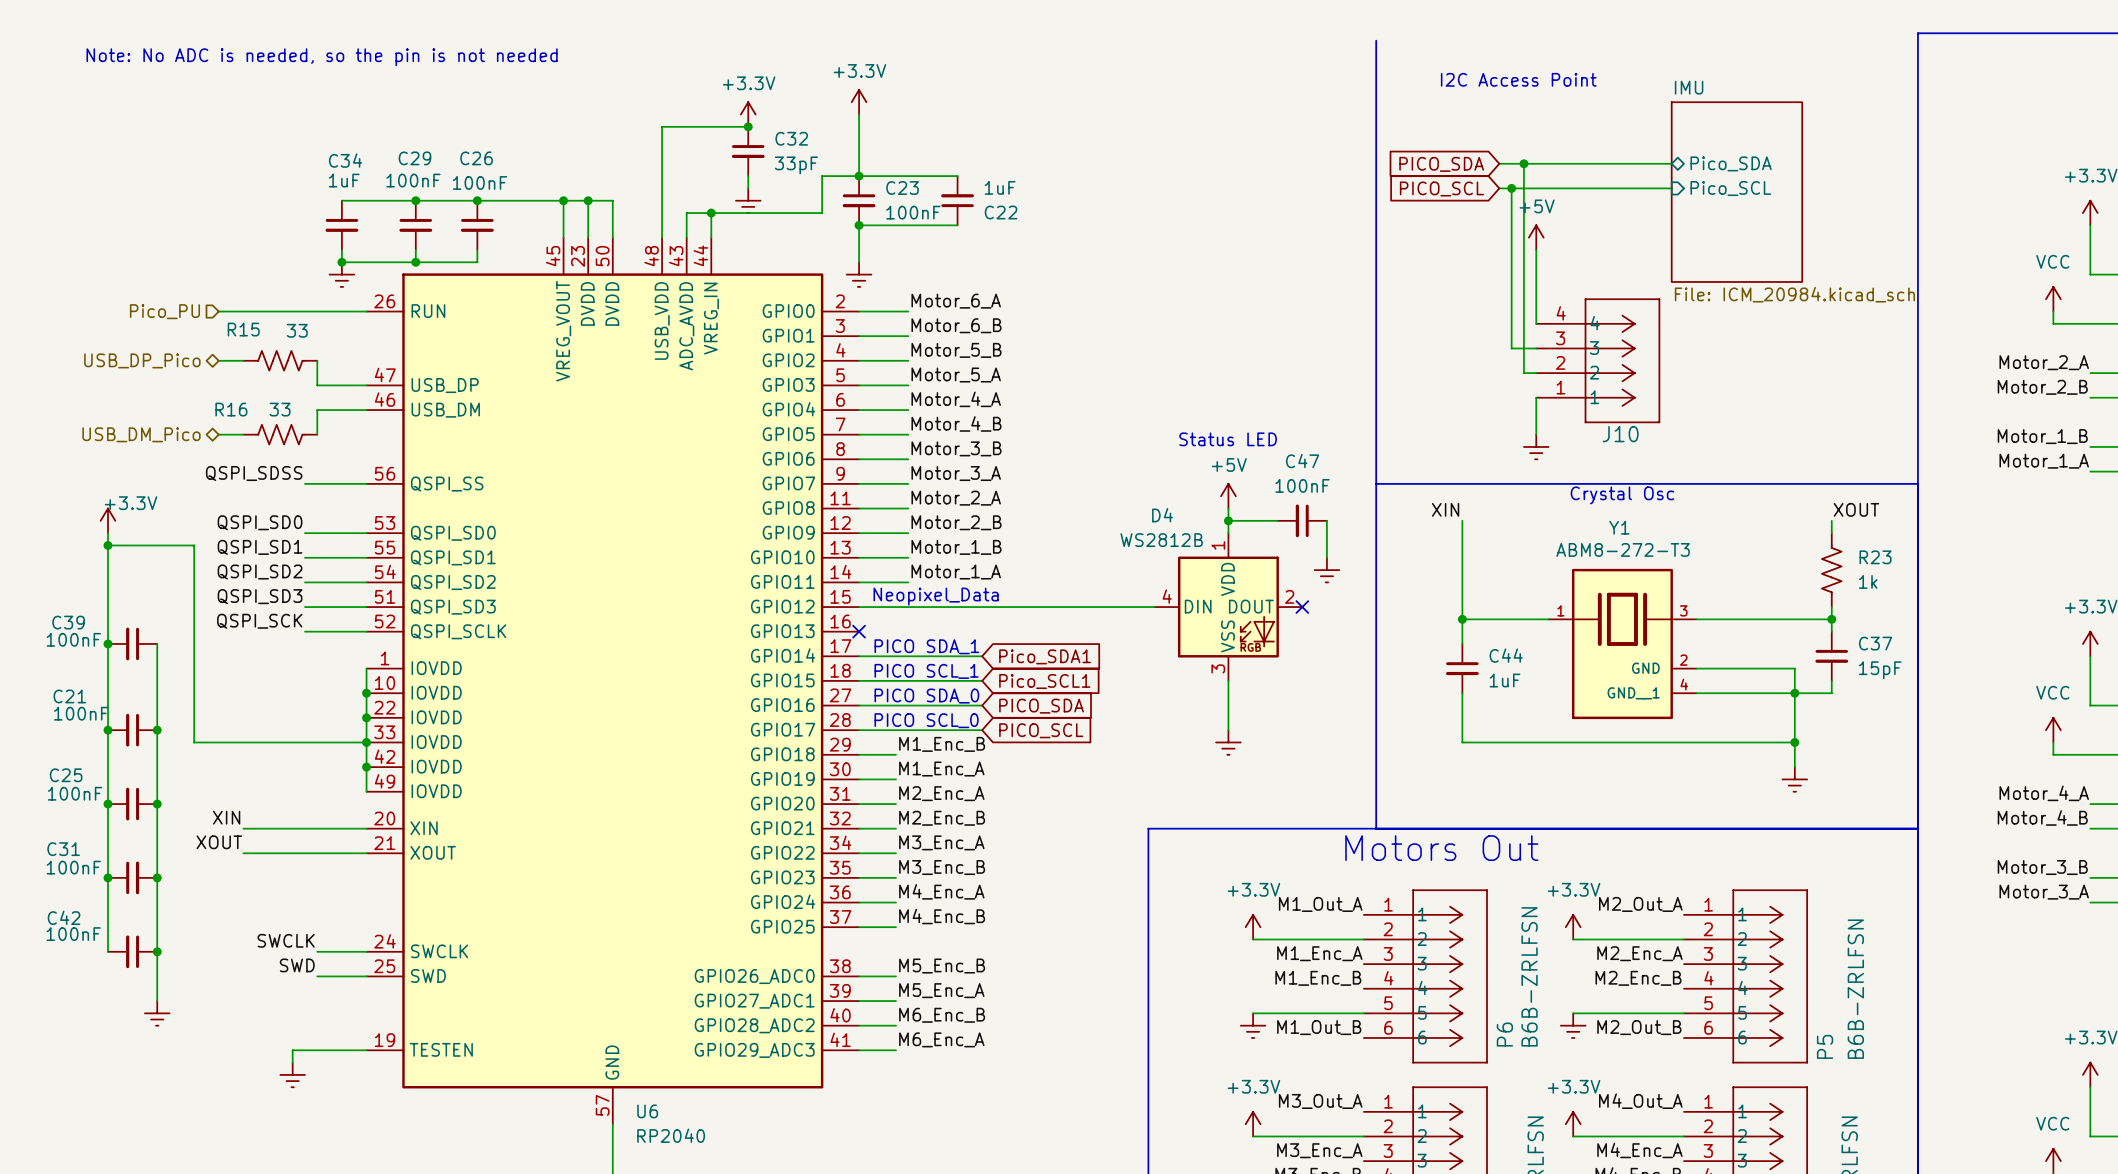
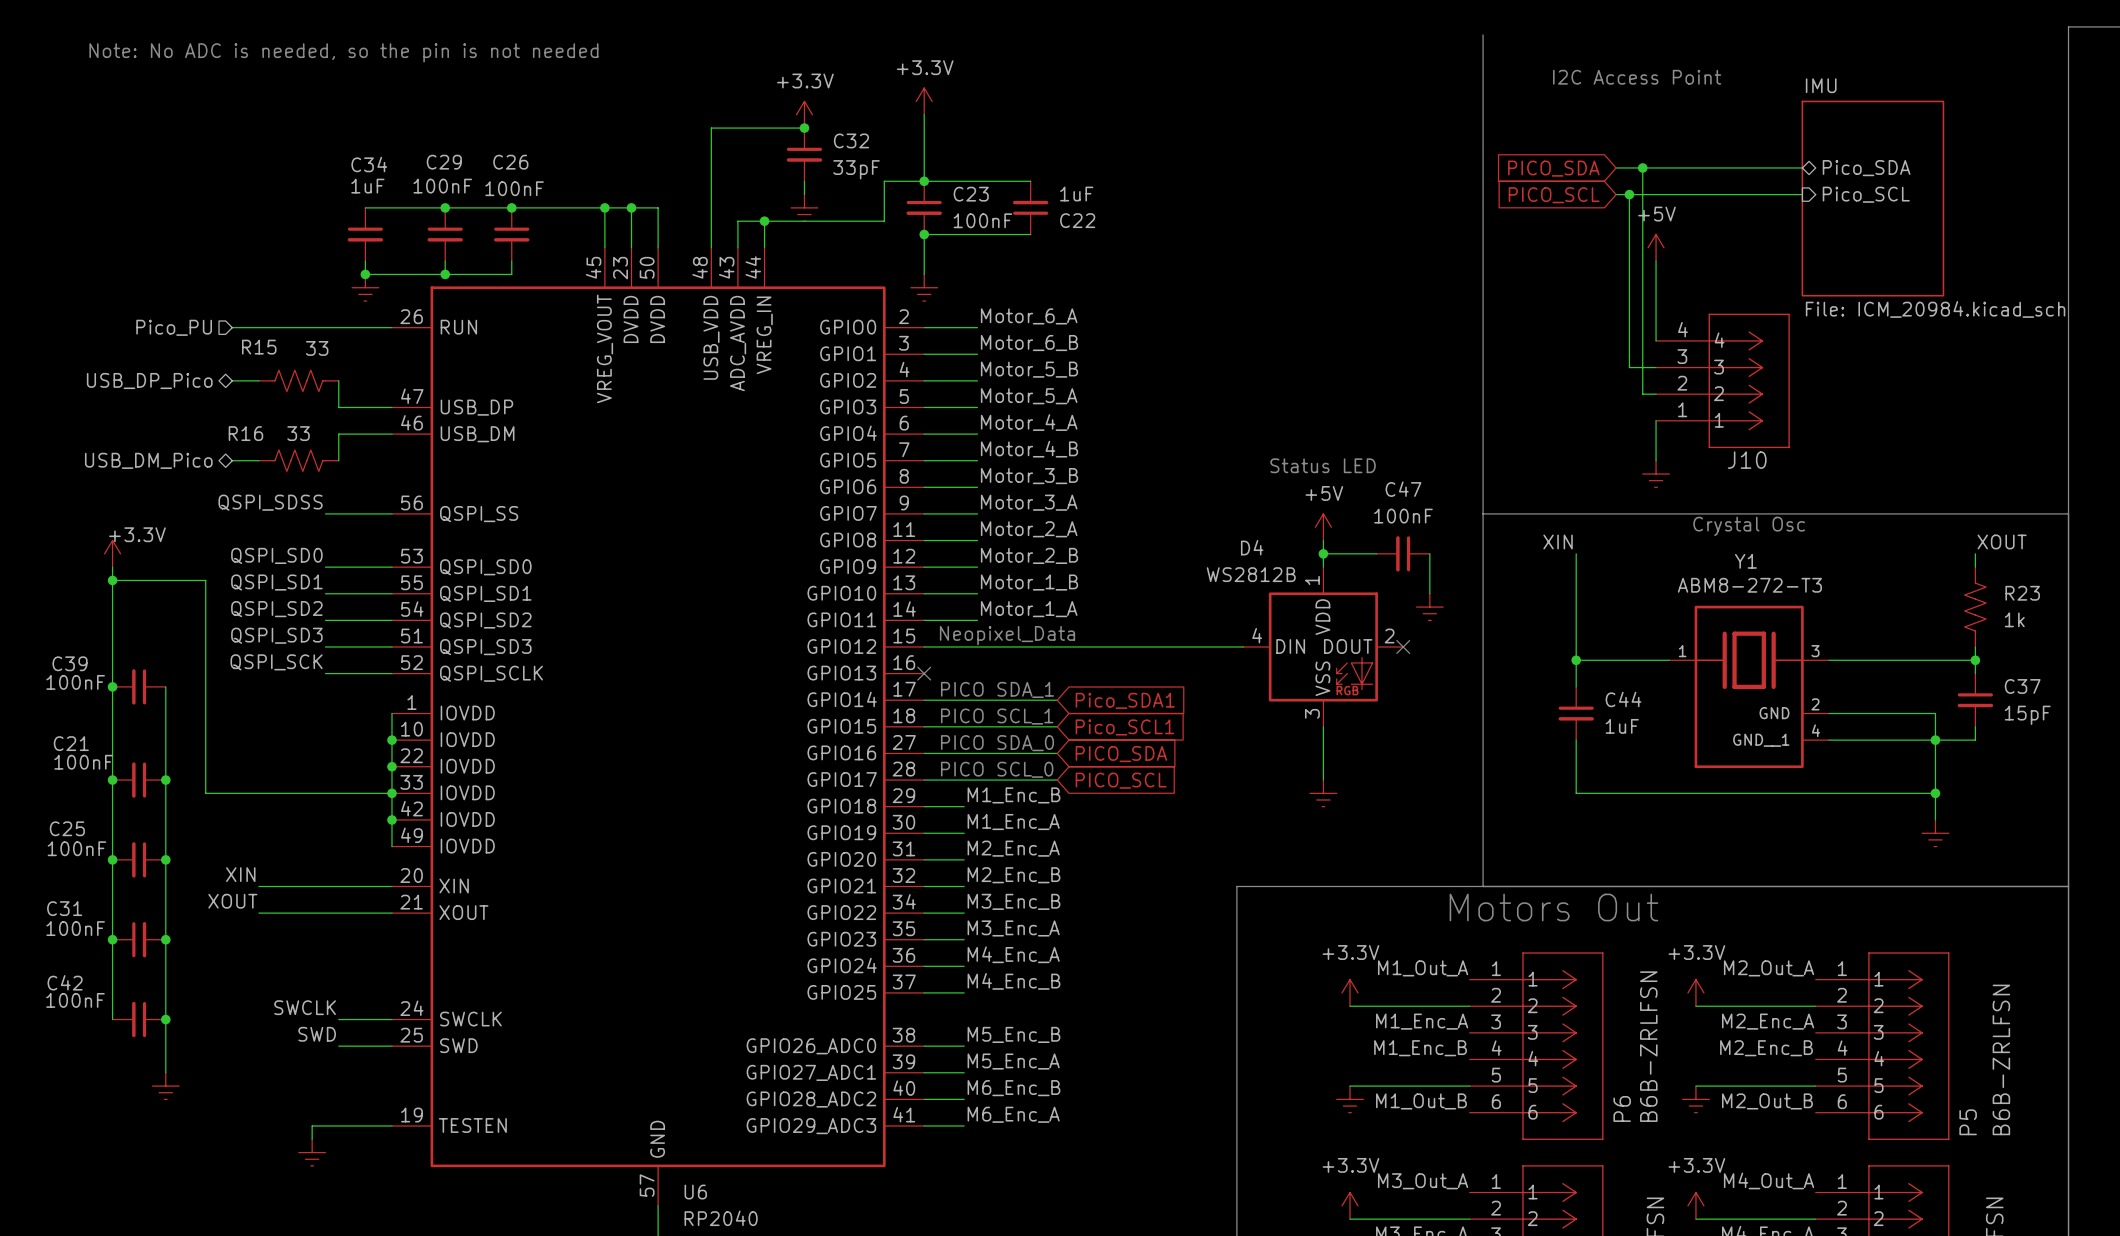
label: M3_Enc_A (941, 842) -> M3_Enc_B (1013, 901)
label: M3_Enc_B (942, 867) -> M3_Enc_A (1013, 928)

